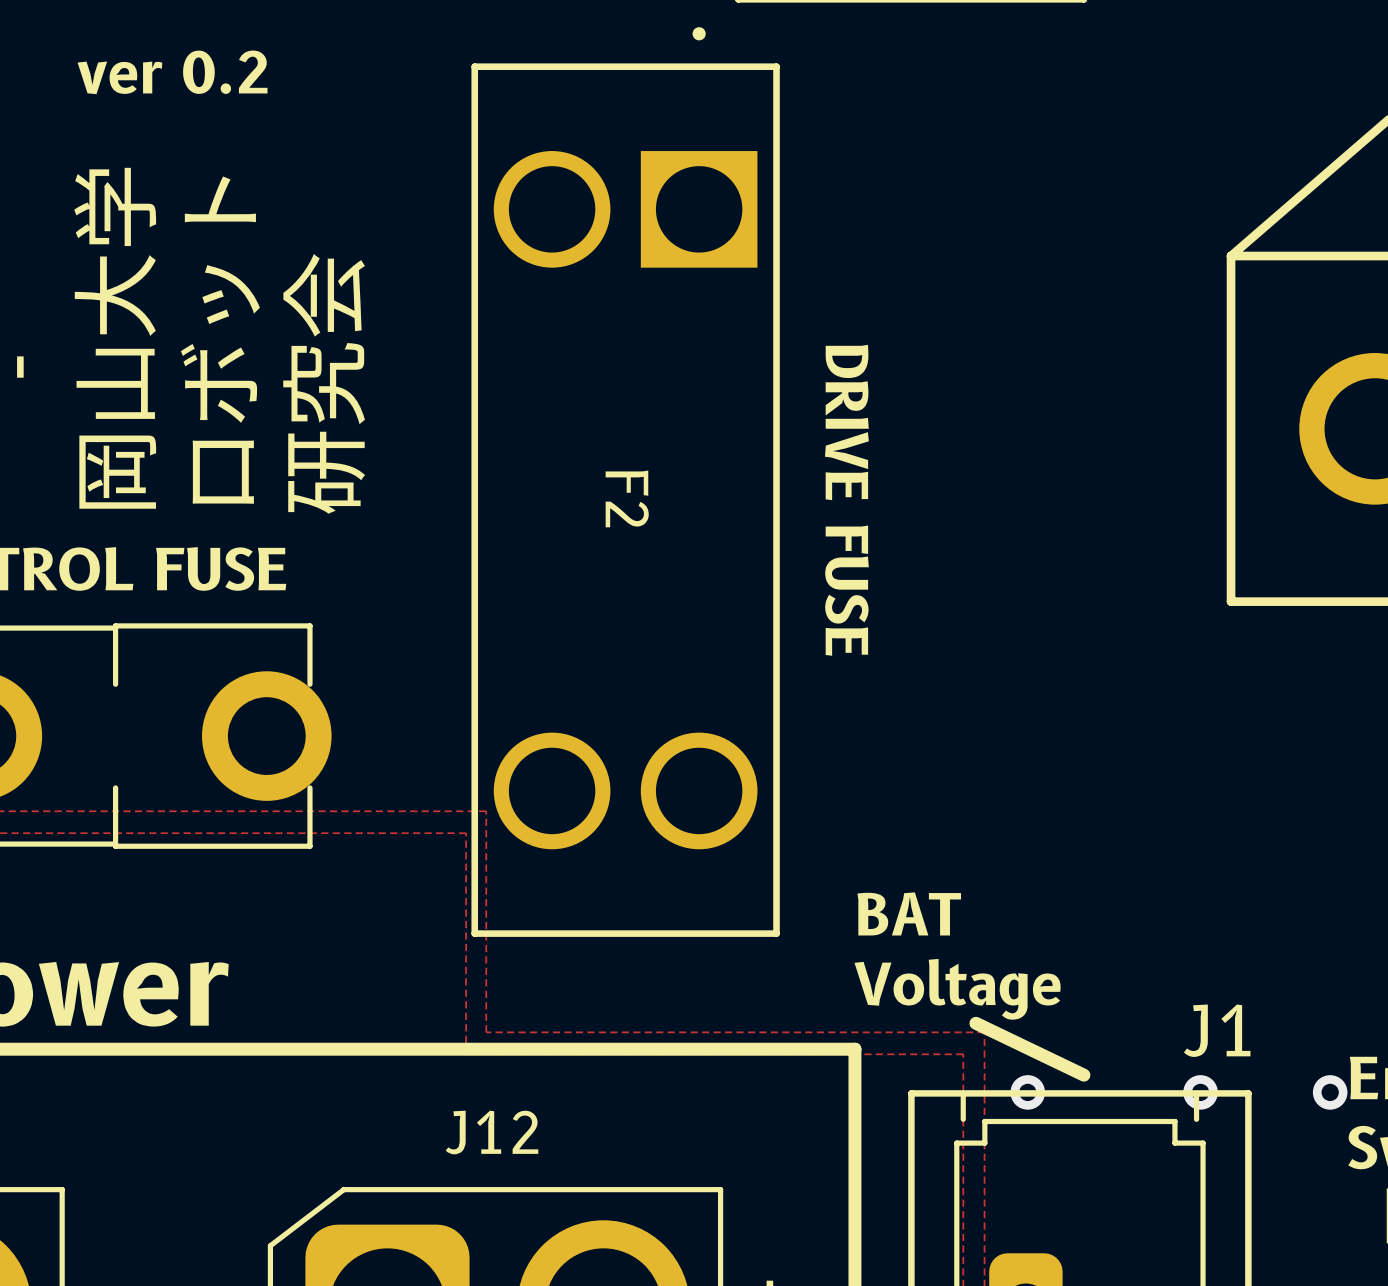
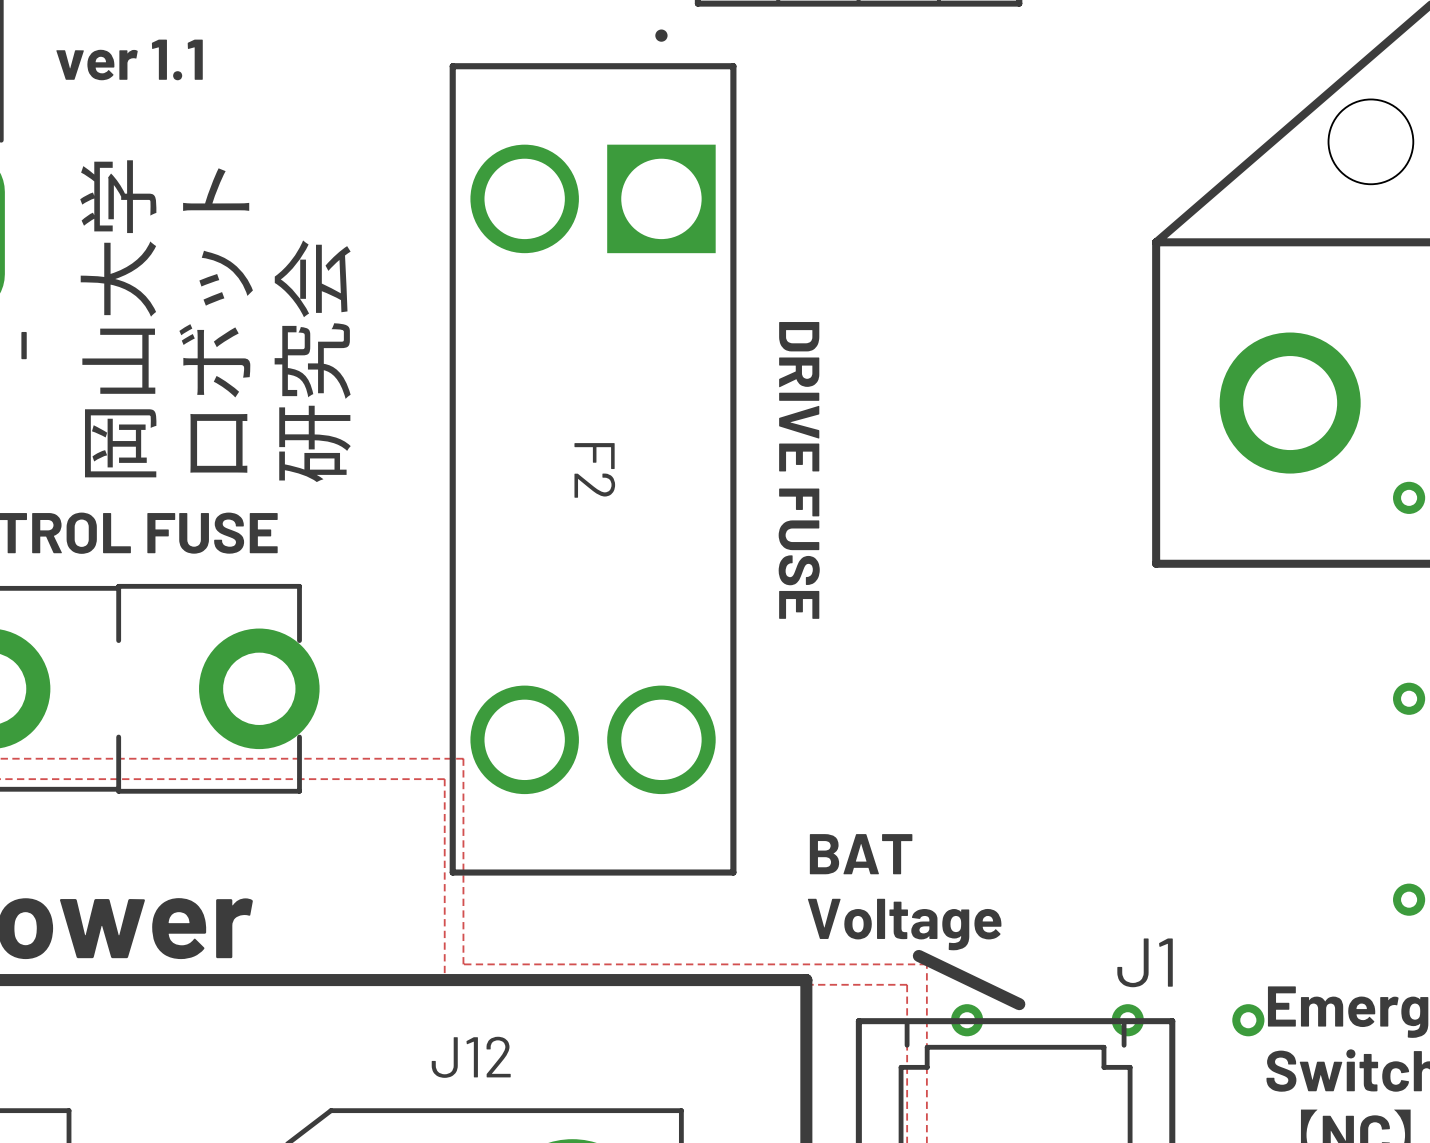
text: ver 0.2 (172, 72) -> ver 1.1 (129, 59)

